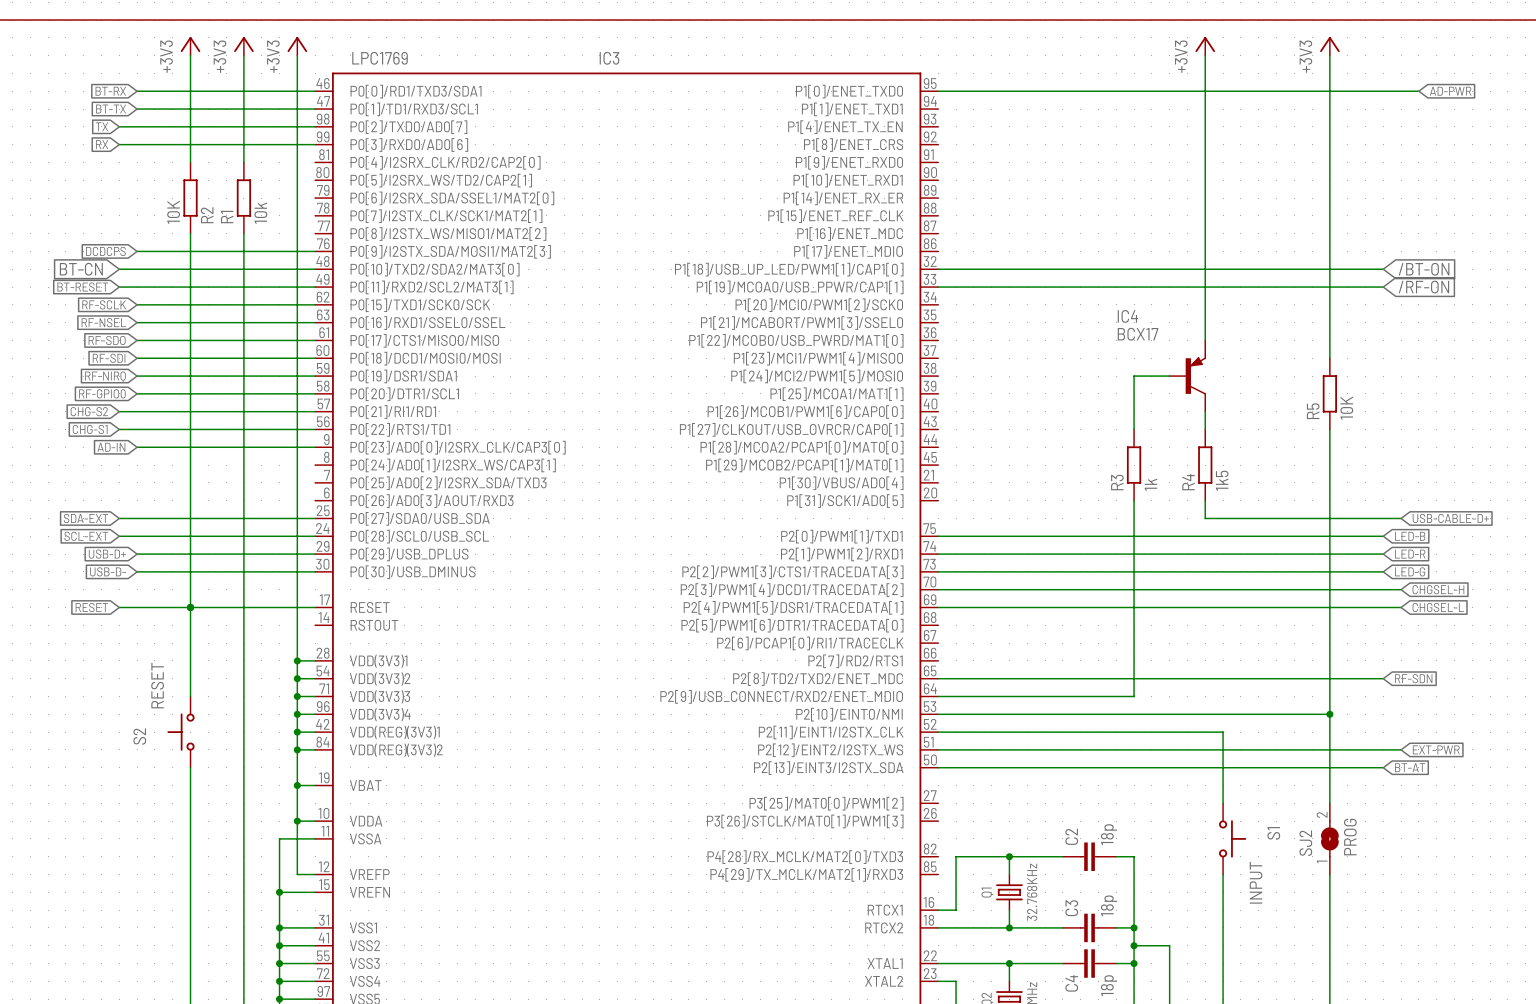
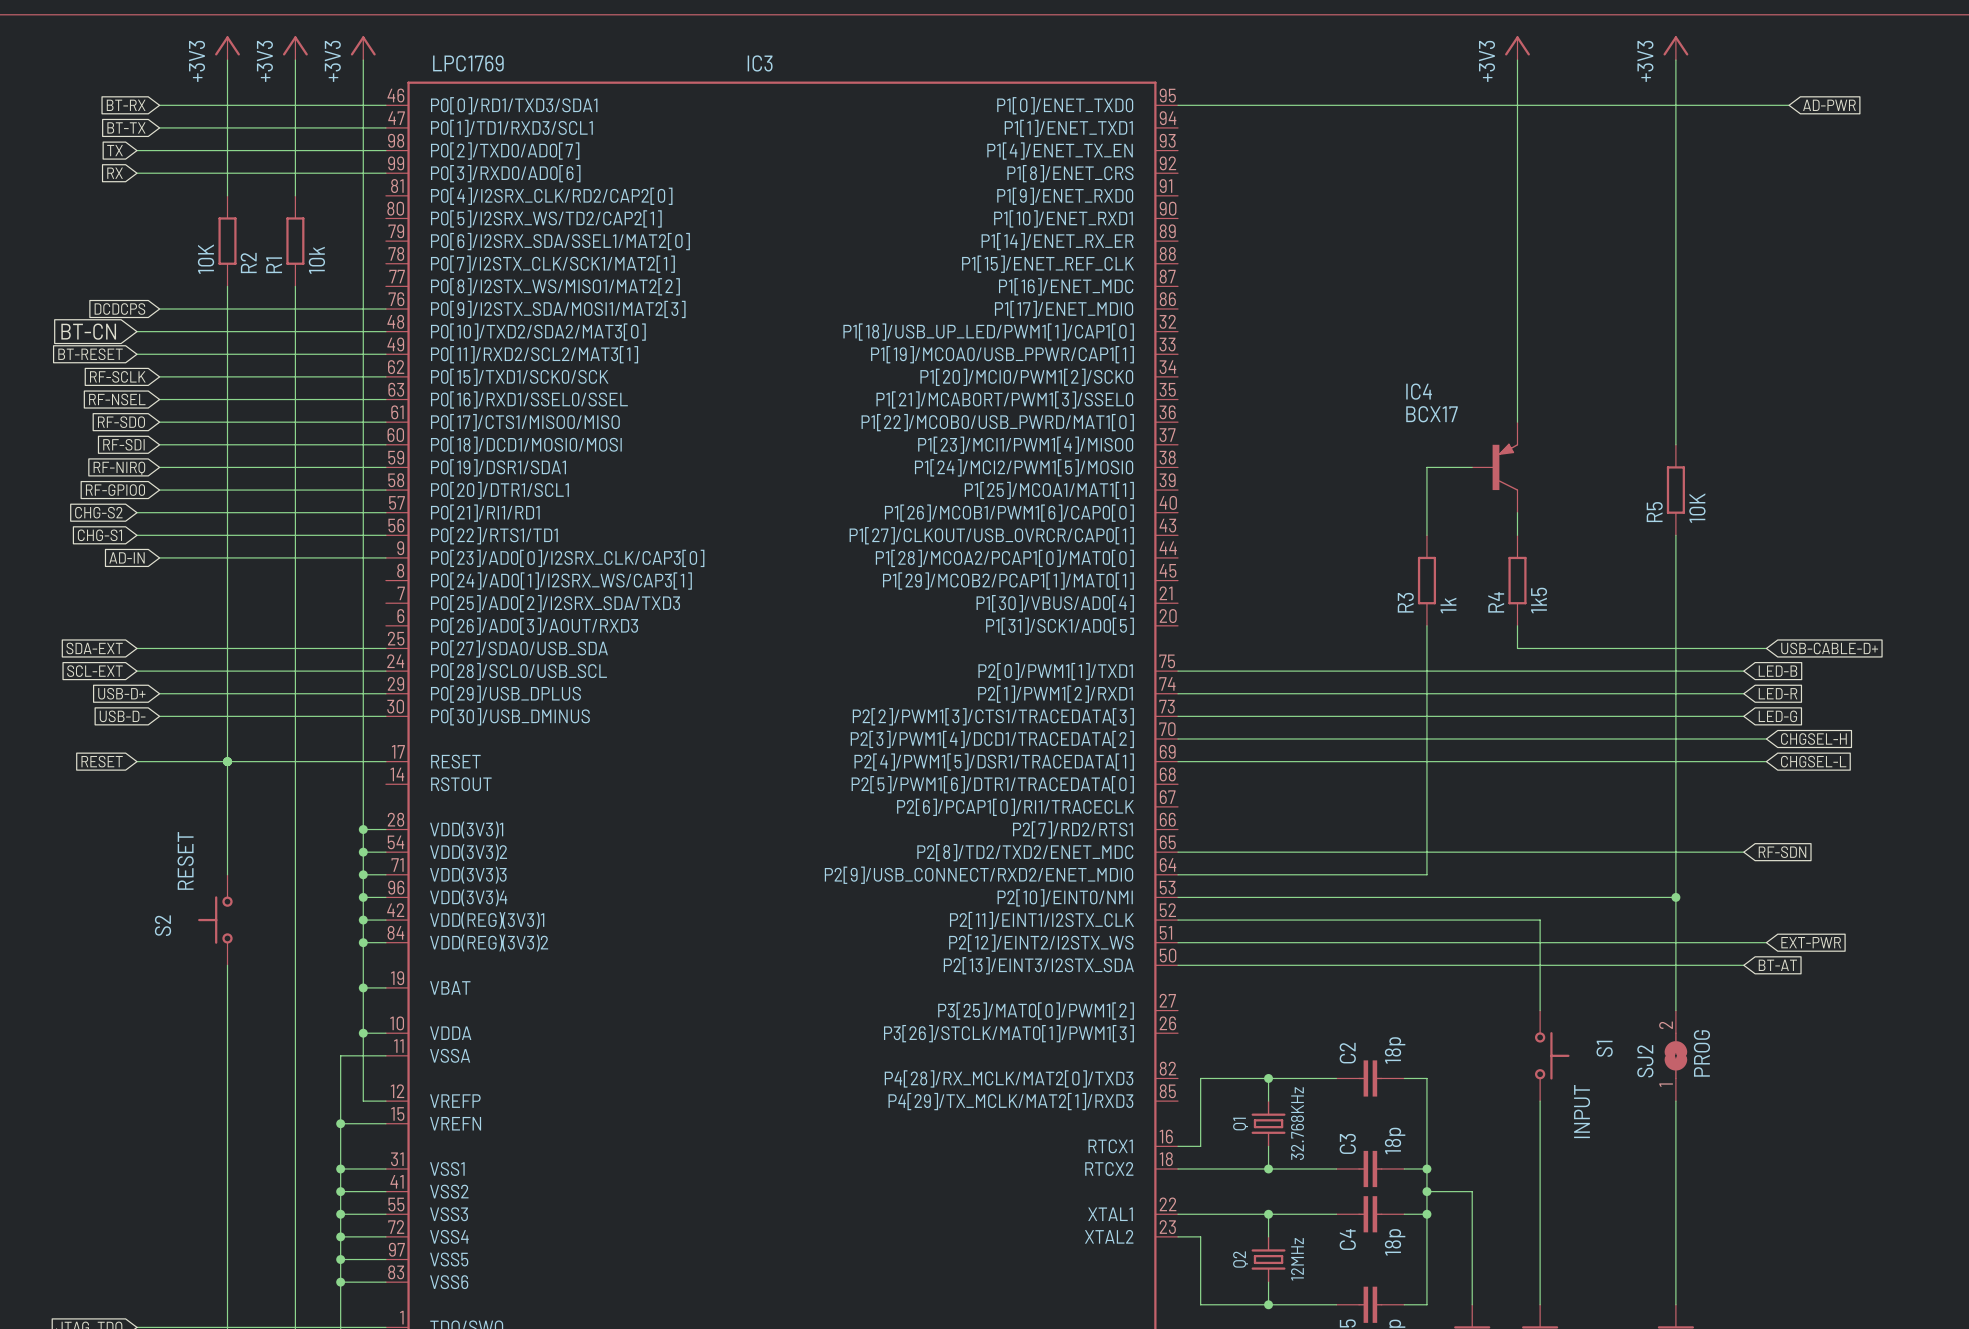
wire: (938, 269) (1383, 269) -> none
global label: /BT-ON (1424, 269) -> none
wire: (938, 287) (1383, 287) -> none
global label: /RF-ON (1423, 287) -> none

